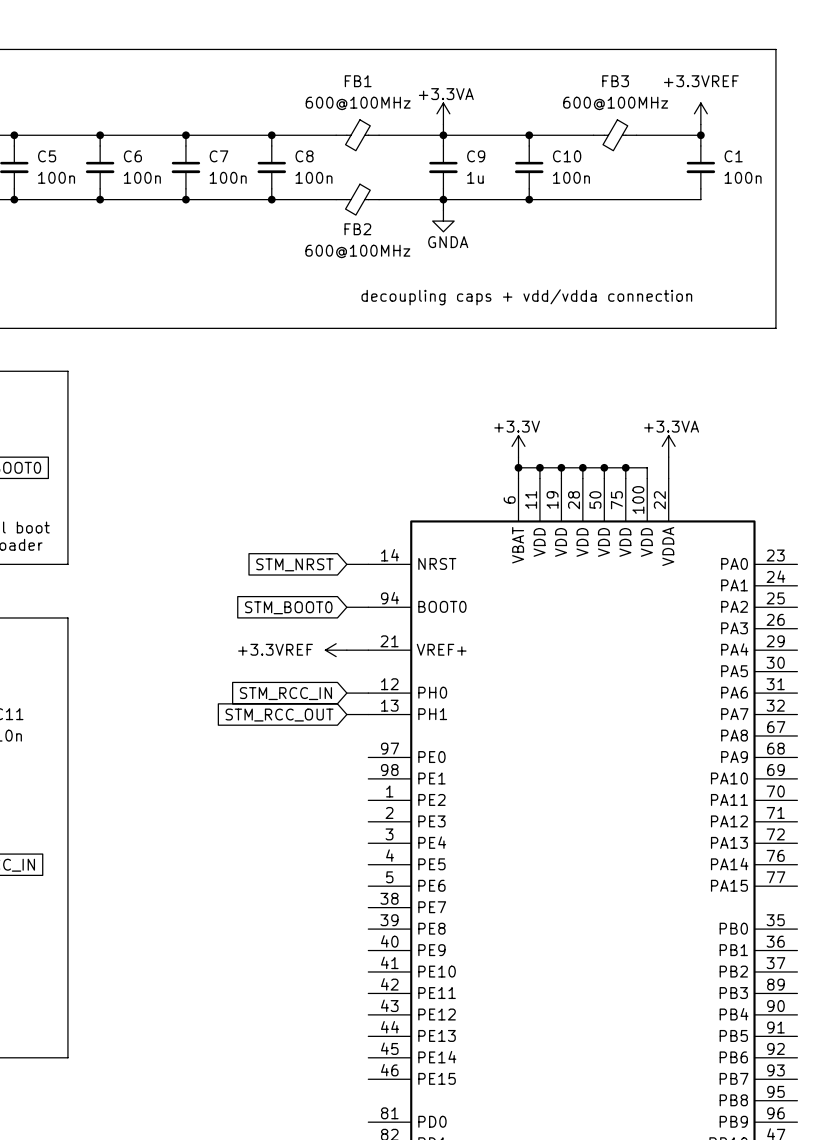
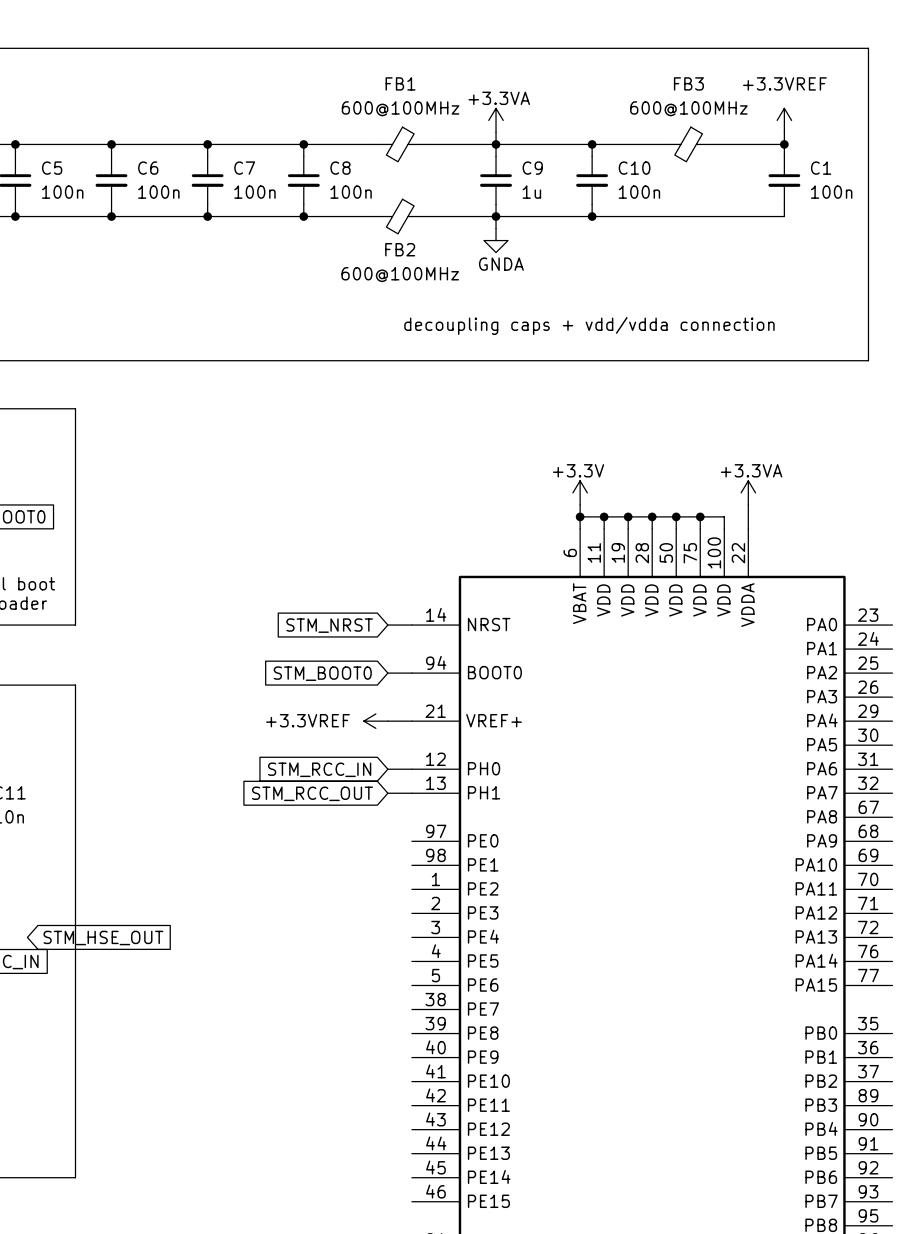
global label: none -> STM_HSE_OUT (103, 937)

